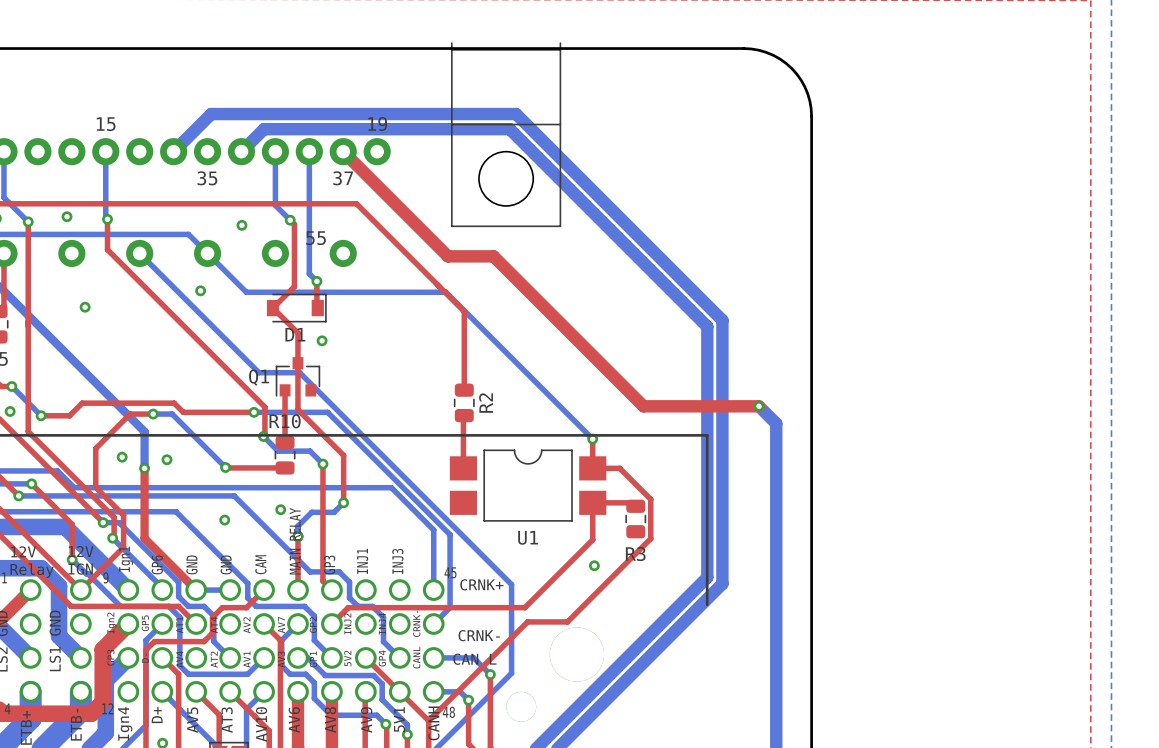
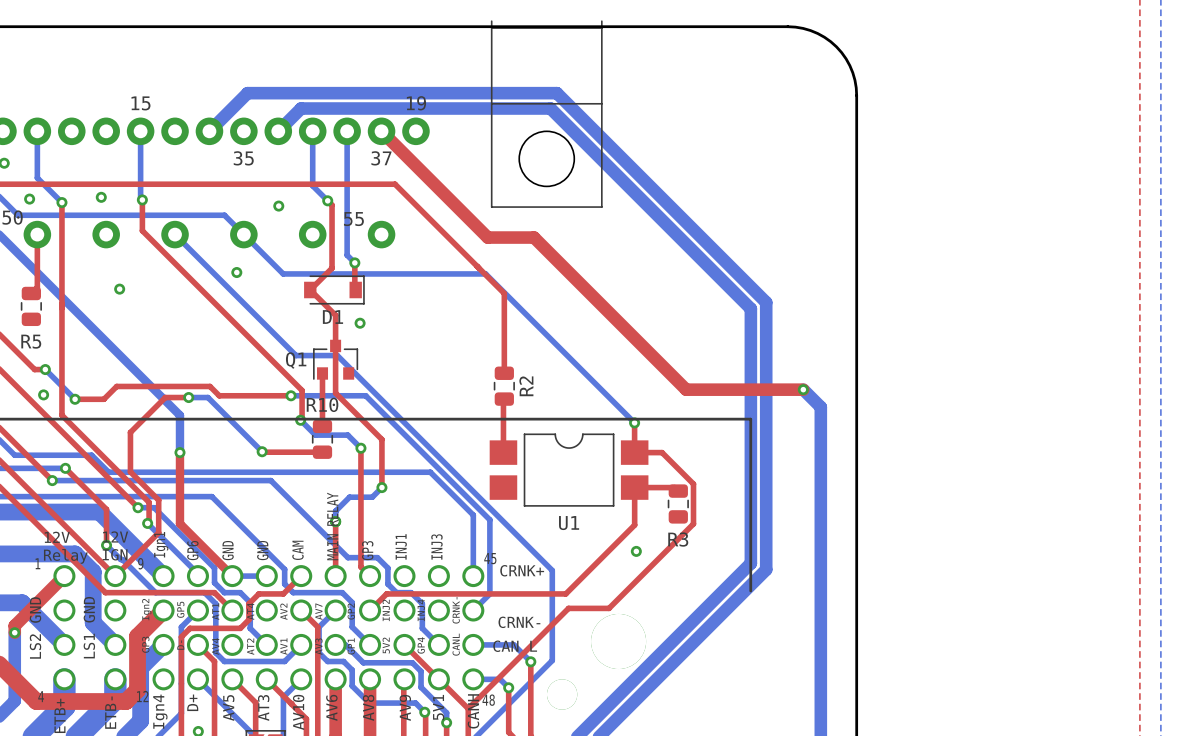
via: (122, 457) -> none
via: (166, 459) -> none
via: (280, 509) -> none
via: (224, 520) -> none

